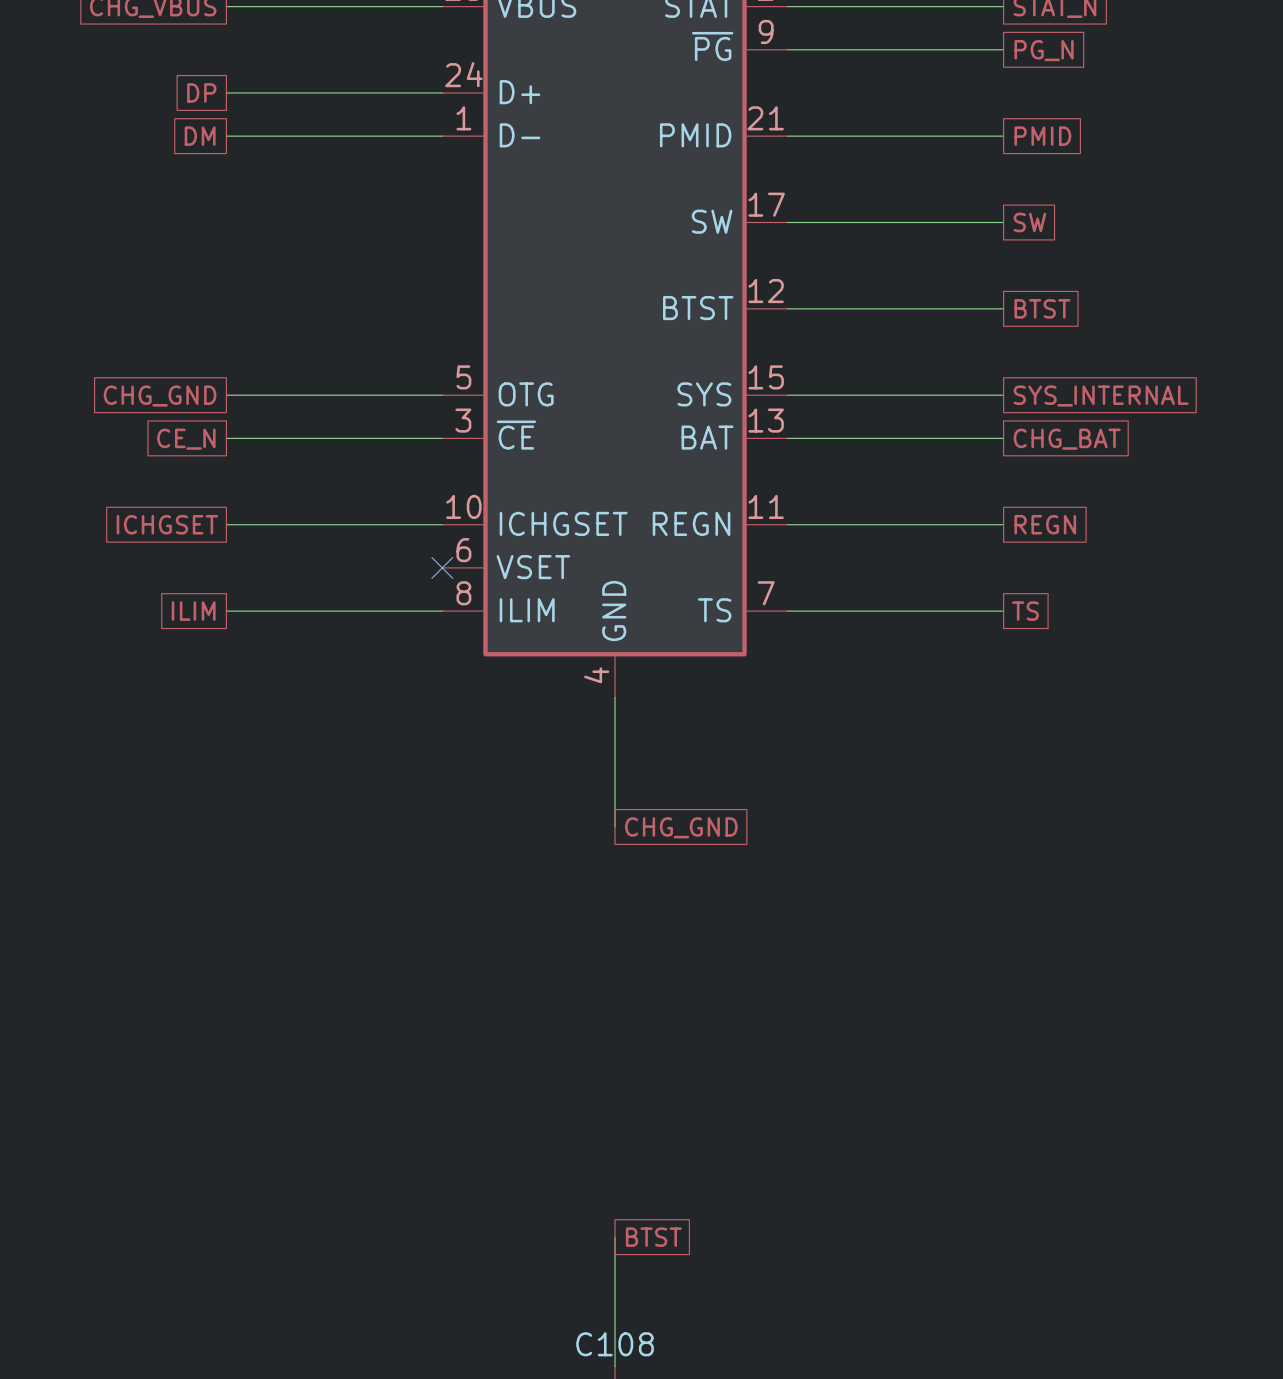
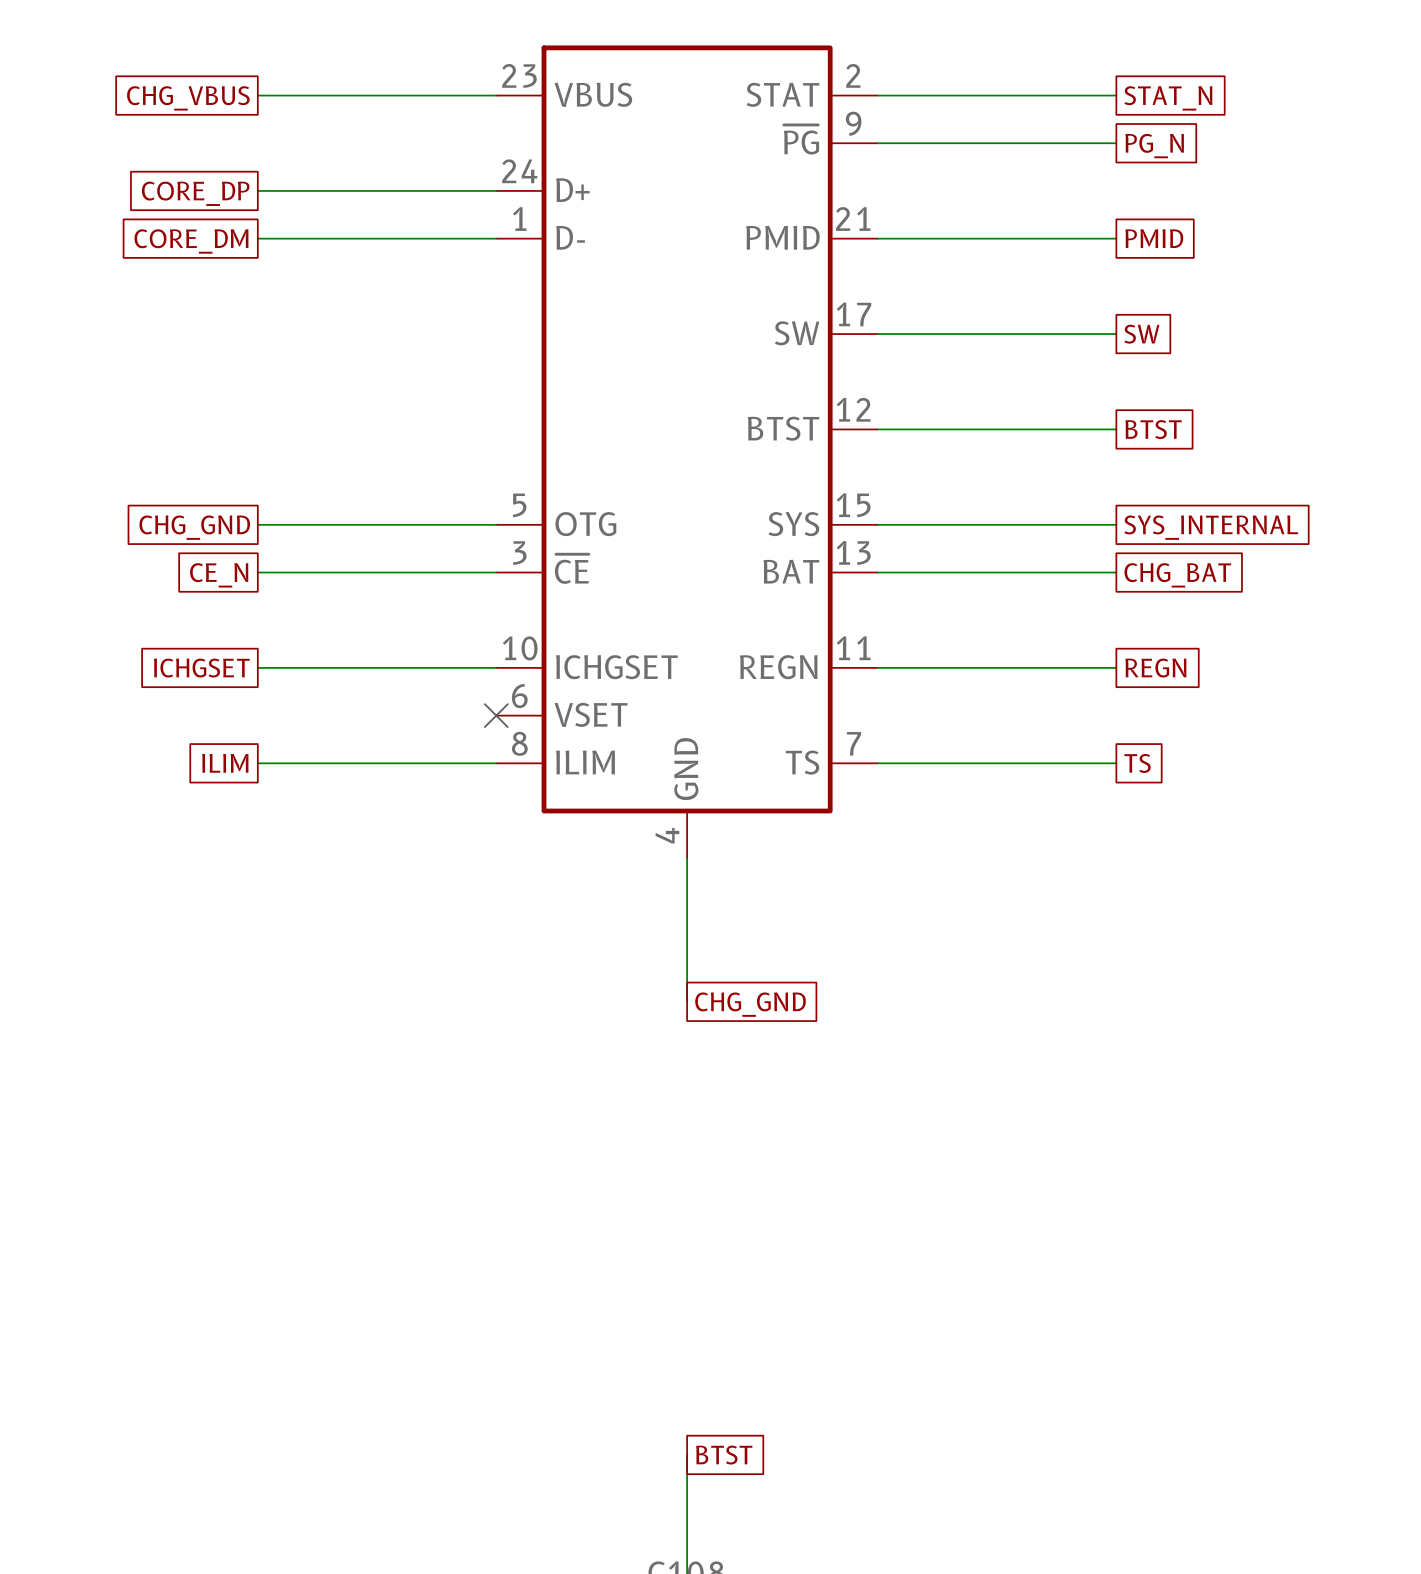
global label: DP (201, 92) -> CORE_DP (195, 193)
global label: DM (200, 136) -> CORE_DM (191, 241)

